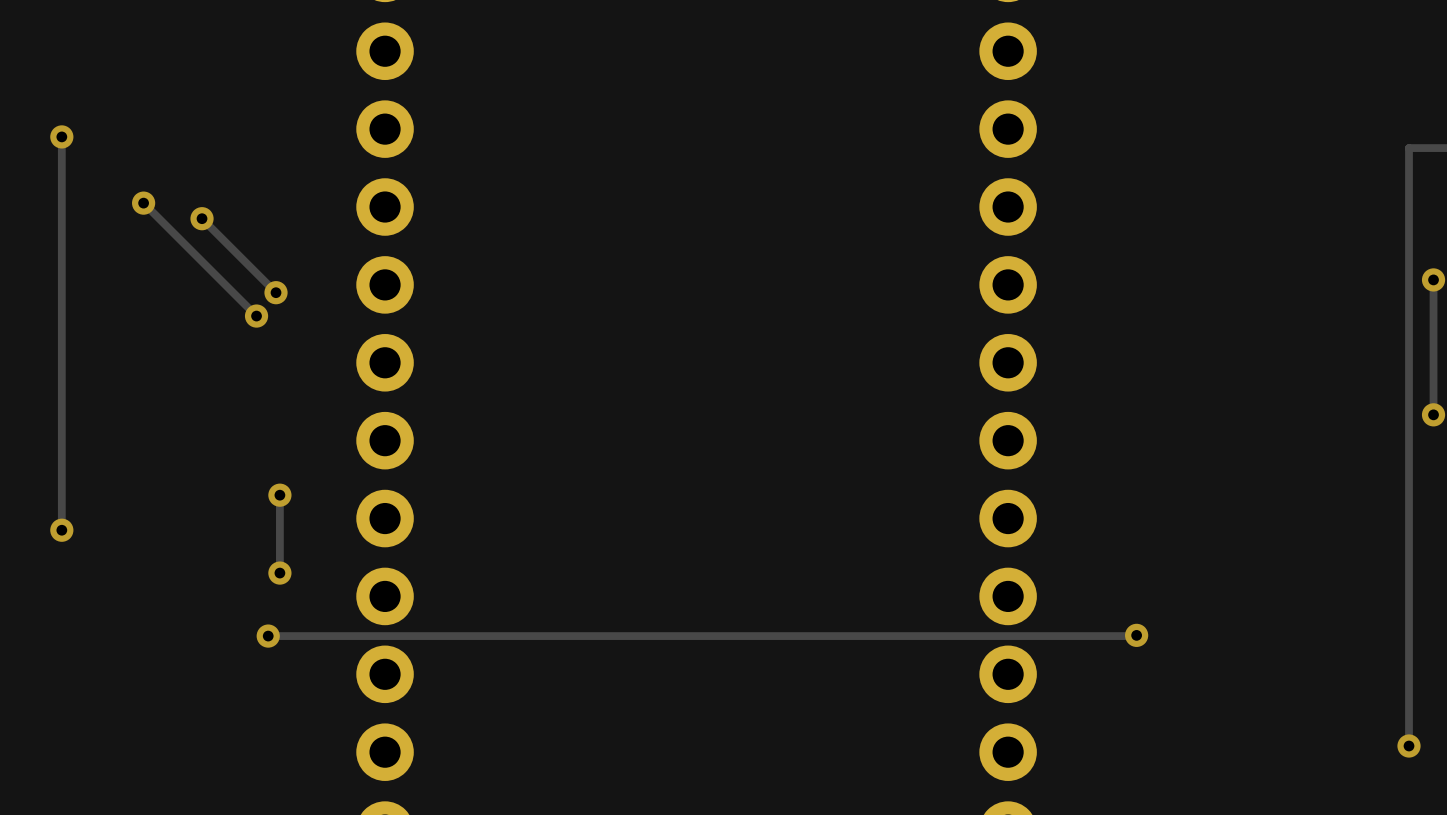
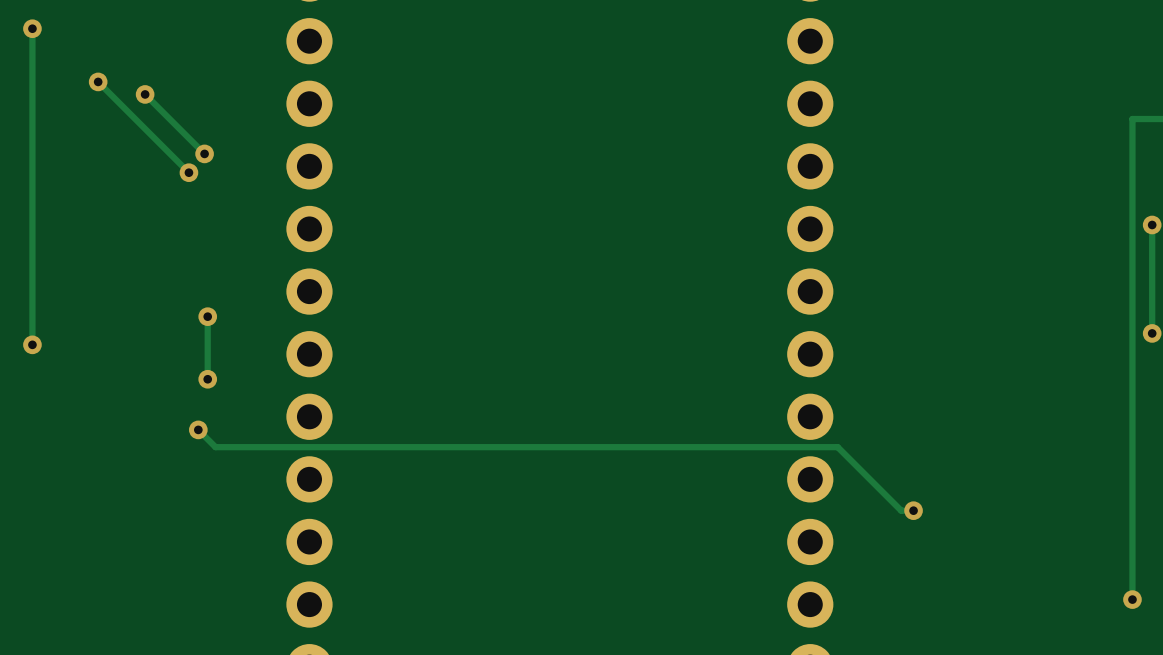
via: none -> (32, 28)
via: none -> (98, 81)
via: none -> (145, 94)
track: (61, 136) (61, 530) -> (32, 28) (32, 344)
via: (61, 136) -> none
via: none -> (204, 153)
track: (143, 203) (256, 316) -> (98, 81) (188, 172)
via: (143, 203) -> none
via: none -> (188, 172)
track: (202, 218) (276, 292) -> (145, 94) (204, 153)
via: (202, 218) -> none
via: (276, 292) -> none
via: (256, 316) -> none
via: none -> (207, 316)
via: none -> (32, 344)
via: none -> (207, 379)
track: (279, 495) (279, 573) -> (207, 316) (207, 379)
via: (279, 495) -> none
via: (61, 530) -> none
via: none -> (198, 429)
via: (279, 573) -> none
track: (1136, 635) (268, 636) -> (913, 510) (901, 510) (837, 447) (215, 447) (198, 429)
via: (268, 636) -> none

